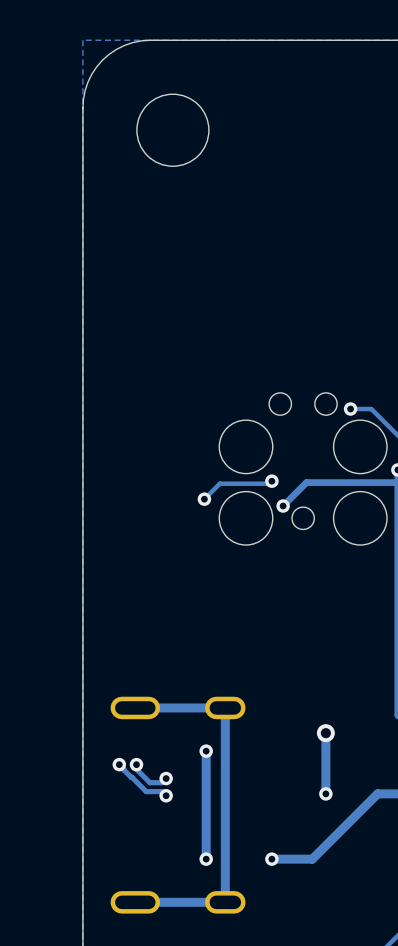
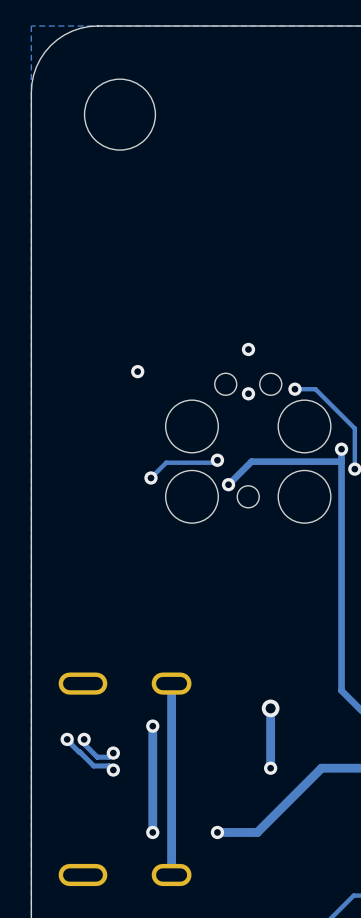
via: none -> (248, 349)
via: none -> (137, 371)
via: none -> (248, 393)
track: (225, 707) (135, 707) -> none
track: (225, 902) (135, 902) -> none

